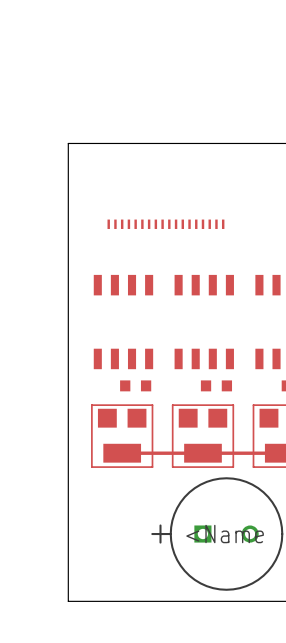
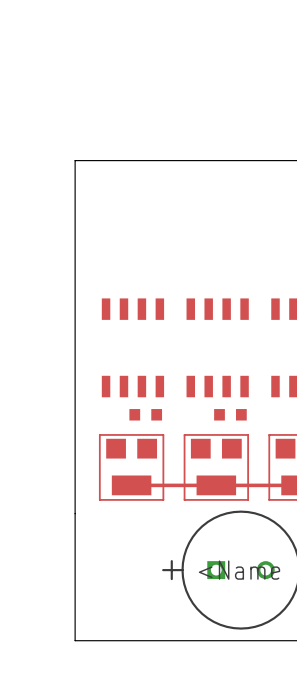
part: (165, 224) -> none

